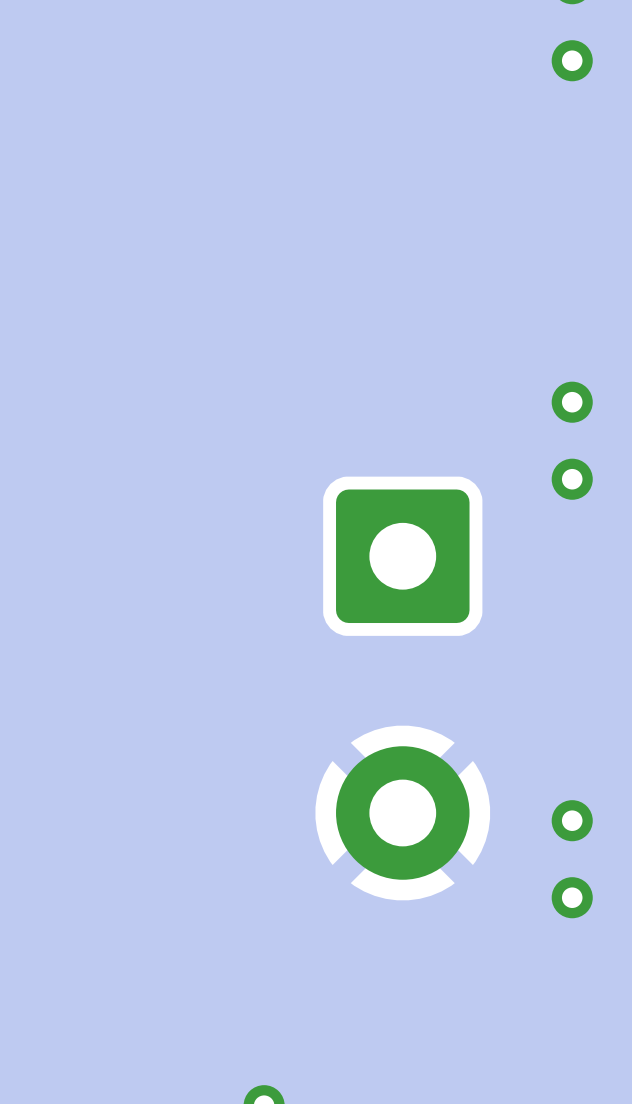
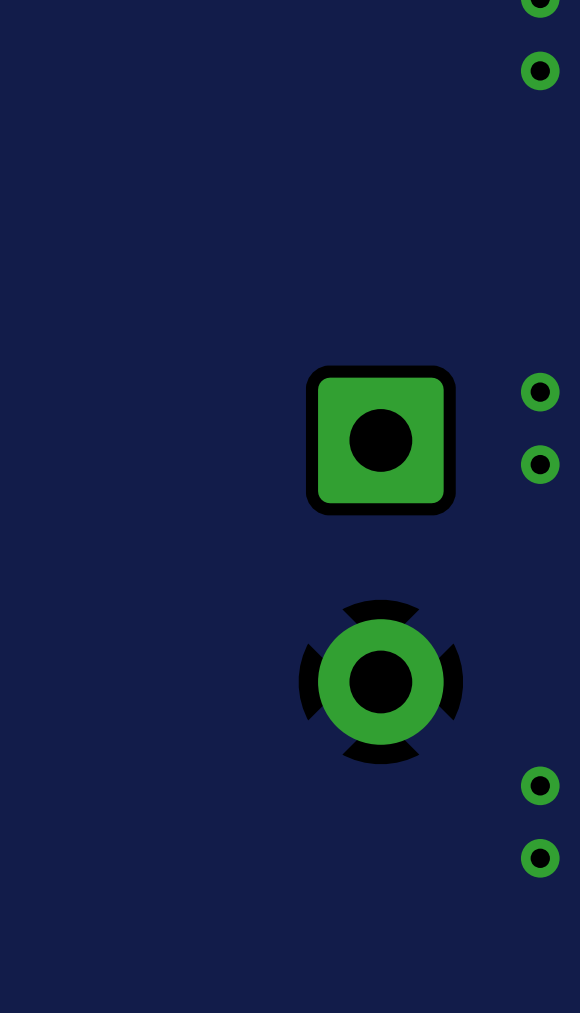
part position: (402, 684) -> (380, 561)

